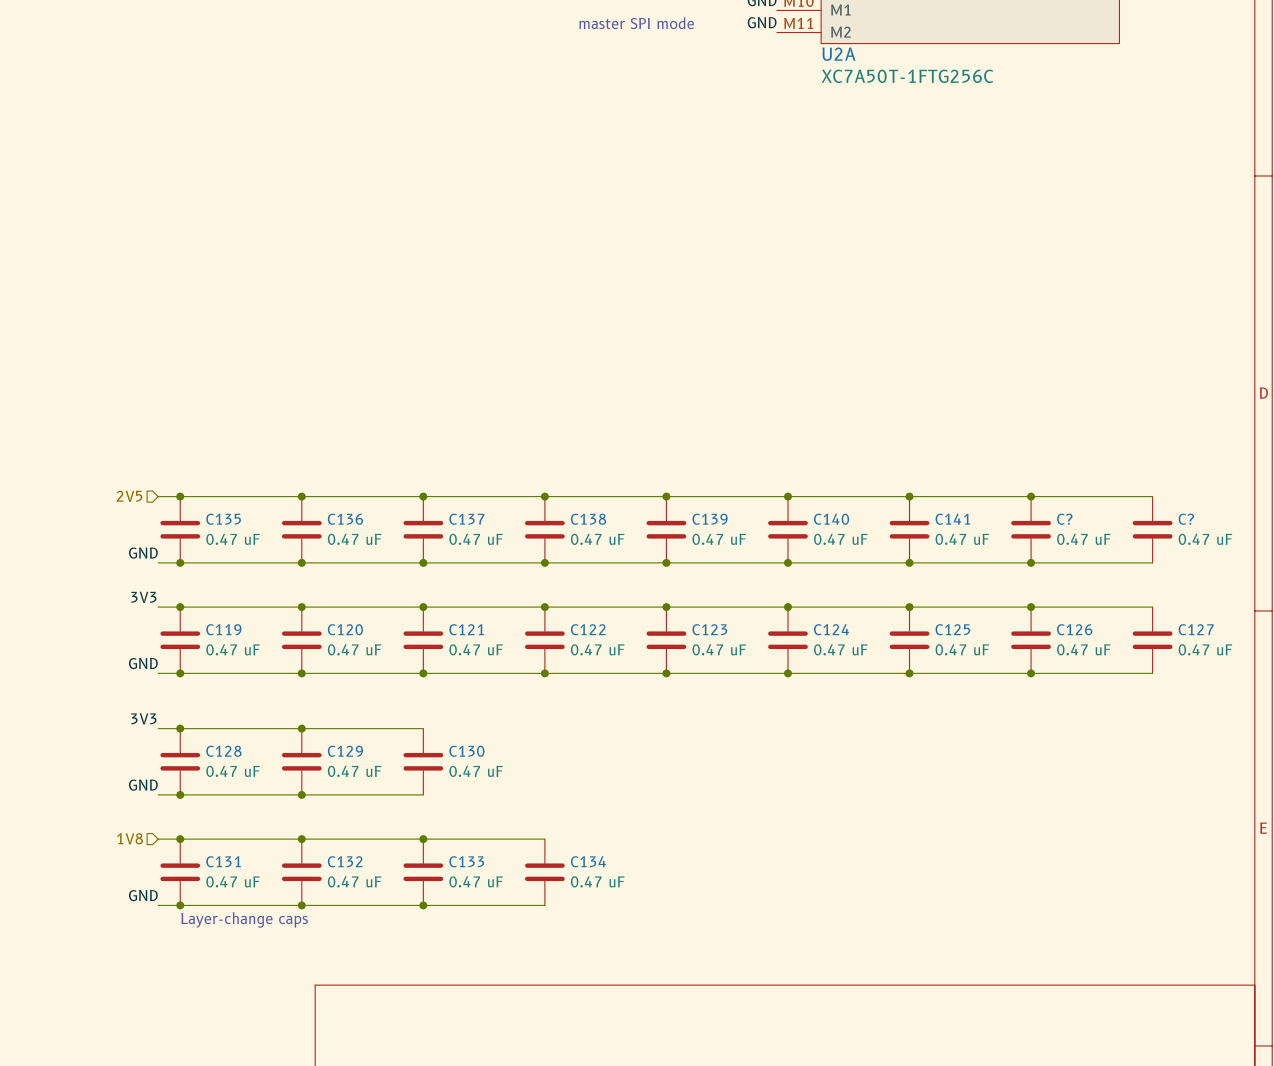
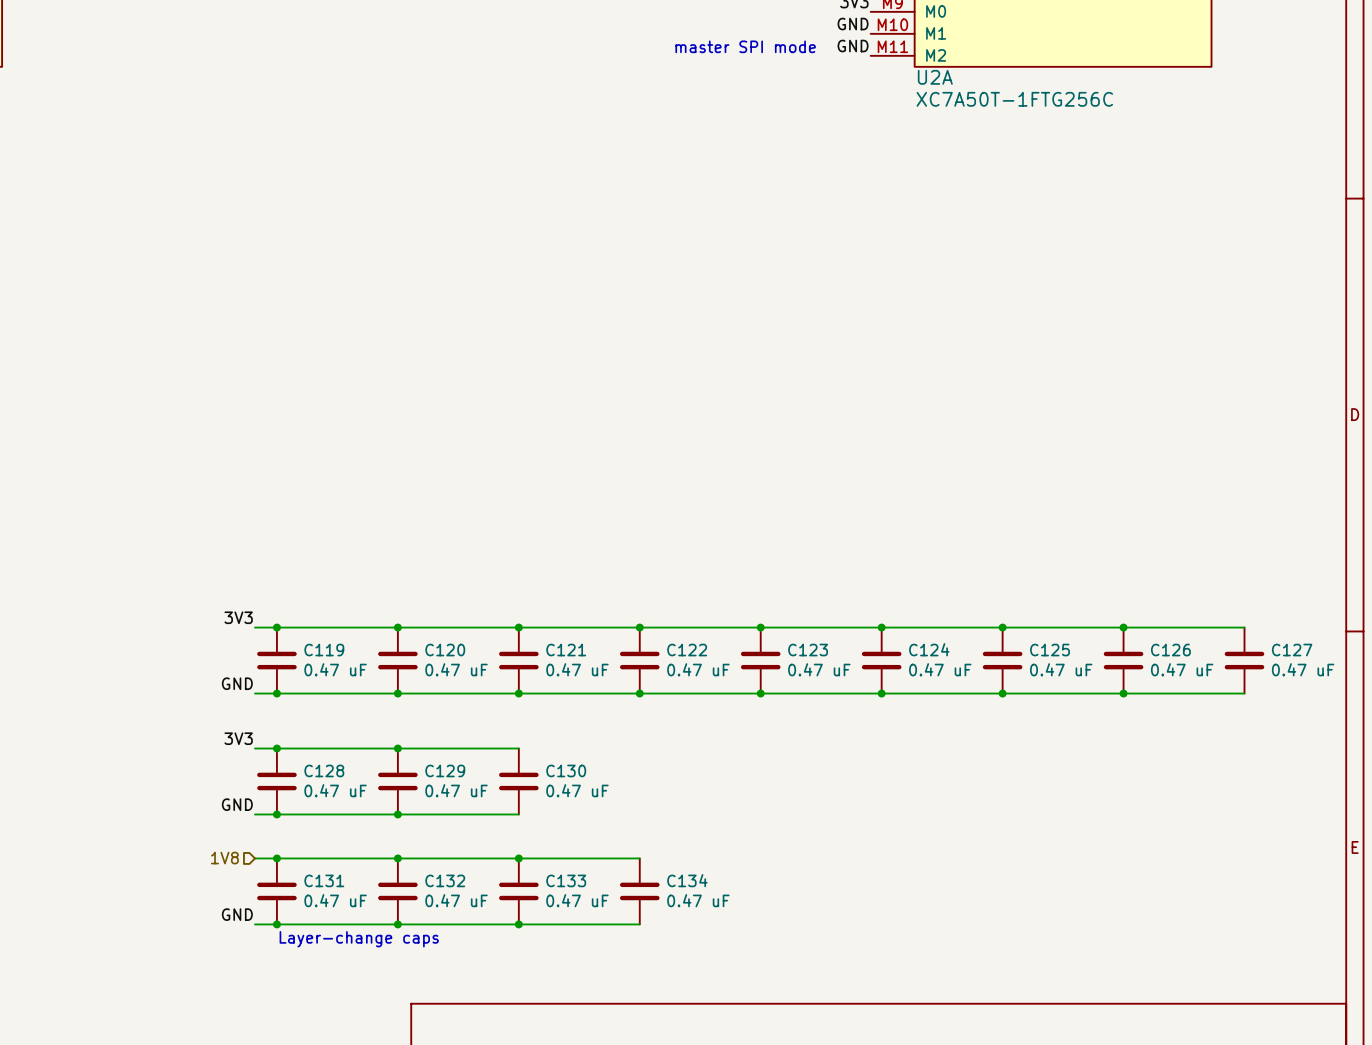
hierarchical label: 2V5 (129, 496) -> none
wire: (158, 496) (1152, 496) -> none
junction: (180, 496) -> none
junction: (301, 496) -> none
junction: (423, 496) -> none
junction: (544, 496) -> none
junction: (666, 496) -> none
junction: (787, 496) -> none
junction: (909, 496) -> none
junction: (1031, 496) -> none
C135: 0.47 uF (180, 529) -> none
C136: 0.47 uF (301, 529) -> none
C137: 0.47 uF (423, 529) -> none
C138: 0.47 uF (544, 529) -> none
C139: 0.47 uF (666, 529) -> none
C140: 0.47 uF (787, 529) -> none
C141: 0.47 uF (909, 529) -> none
C?: 0.47 uF (1031, 529) -> none
C?: 0.47 uF (1152, 529) -> none
label: GND (143, 553) -> none
wire: (158, 562) (1152, 562) -> none
junction: (180, 562) -> none
junction: (301, 562) -> none
junction: (423, 562) -> none
junction: (544, 562) -> none
junction: (666, 562) -> none
junction: (787, 562) -> none
junction: (909, 562) -> none
junction: (1031, 562) -> none

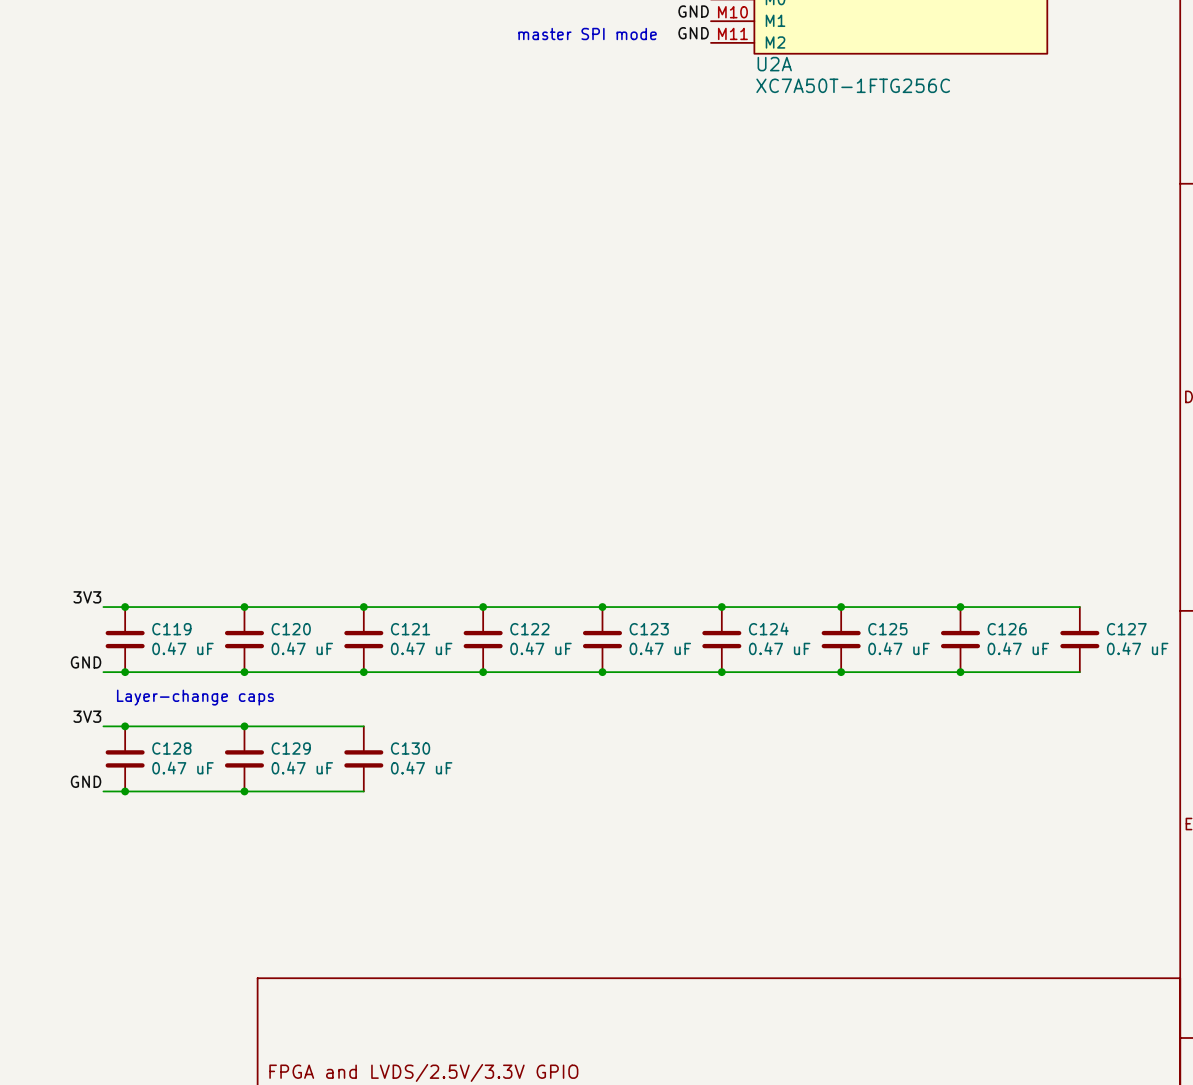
text: none -> Layer-change caps (195, 697)
hierarchical label: 1V8 (224, 858) -> none
wire: (254, 858) (639, 858) -> none
junction: (276, 858) -> none
junction: (397, 858) -> none
junction: (518, 858) -> none
C131: 0.47 uF (276, 891) -> none
C132: 0.47 uF (397, 891) -> none
C133: 0.47 uF (518, 891) -> none
C134: 0.47 uF (639, 891) -> none
label: GND (237, 914) -> none
wire: (254, 924) (639, 924) -> none
junction: (276, 924) -> none
junction: (397, 924) -> none
junction: (518, 924) -> none
text: Layer-change caps (359, 939) -> none

